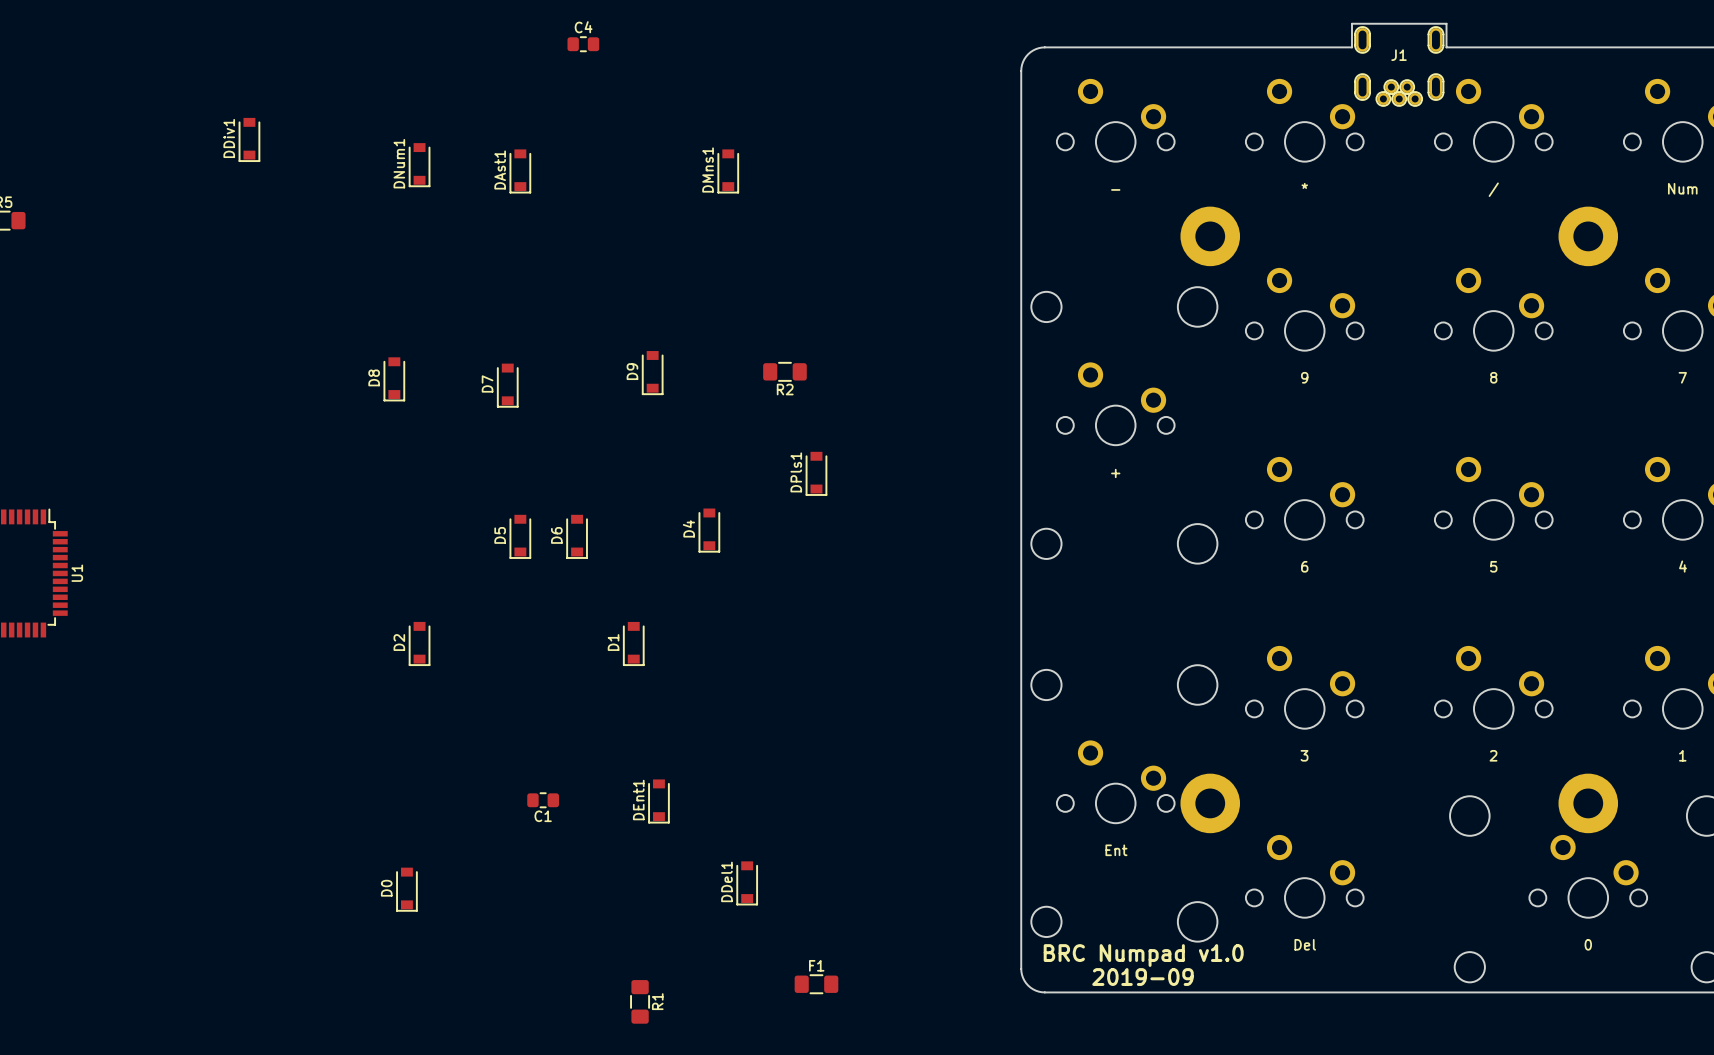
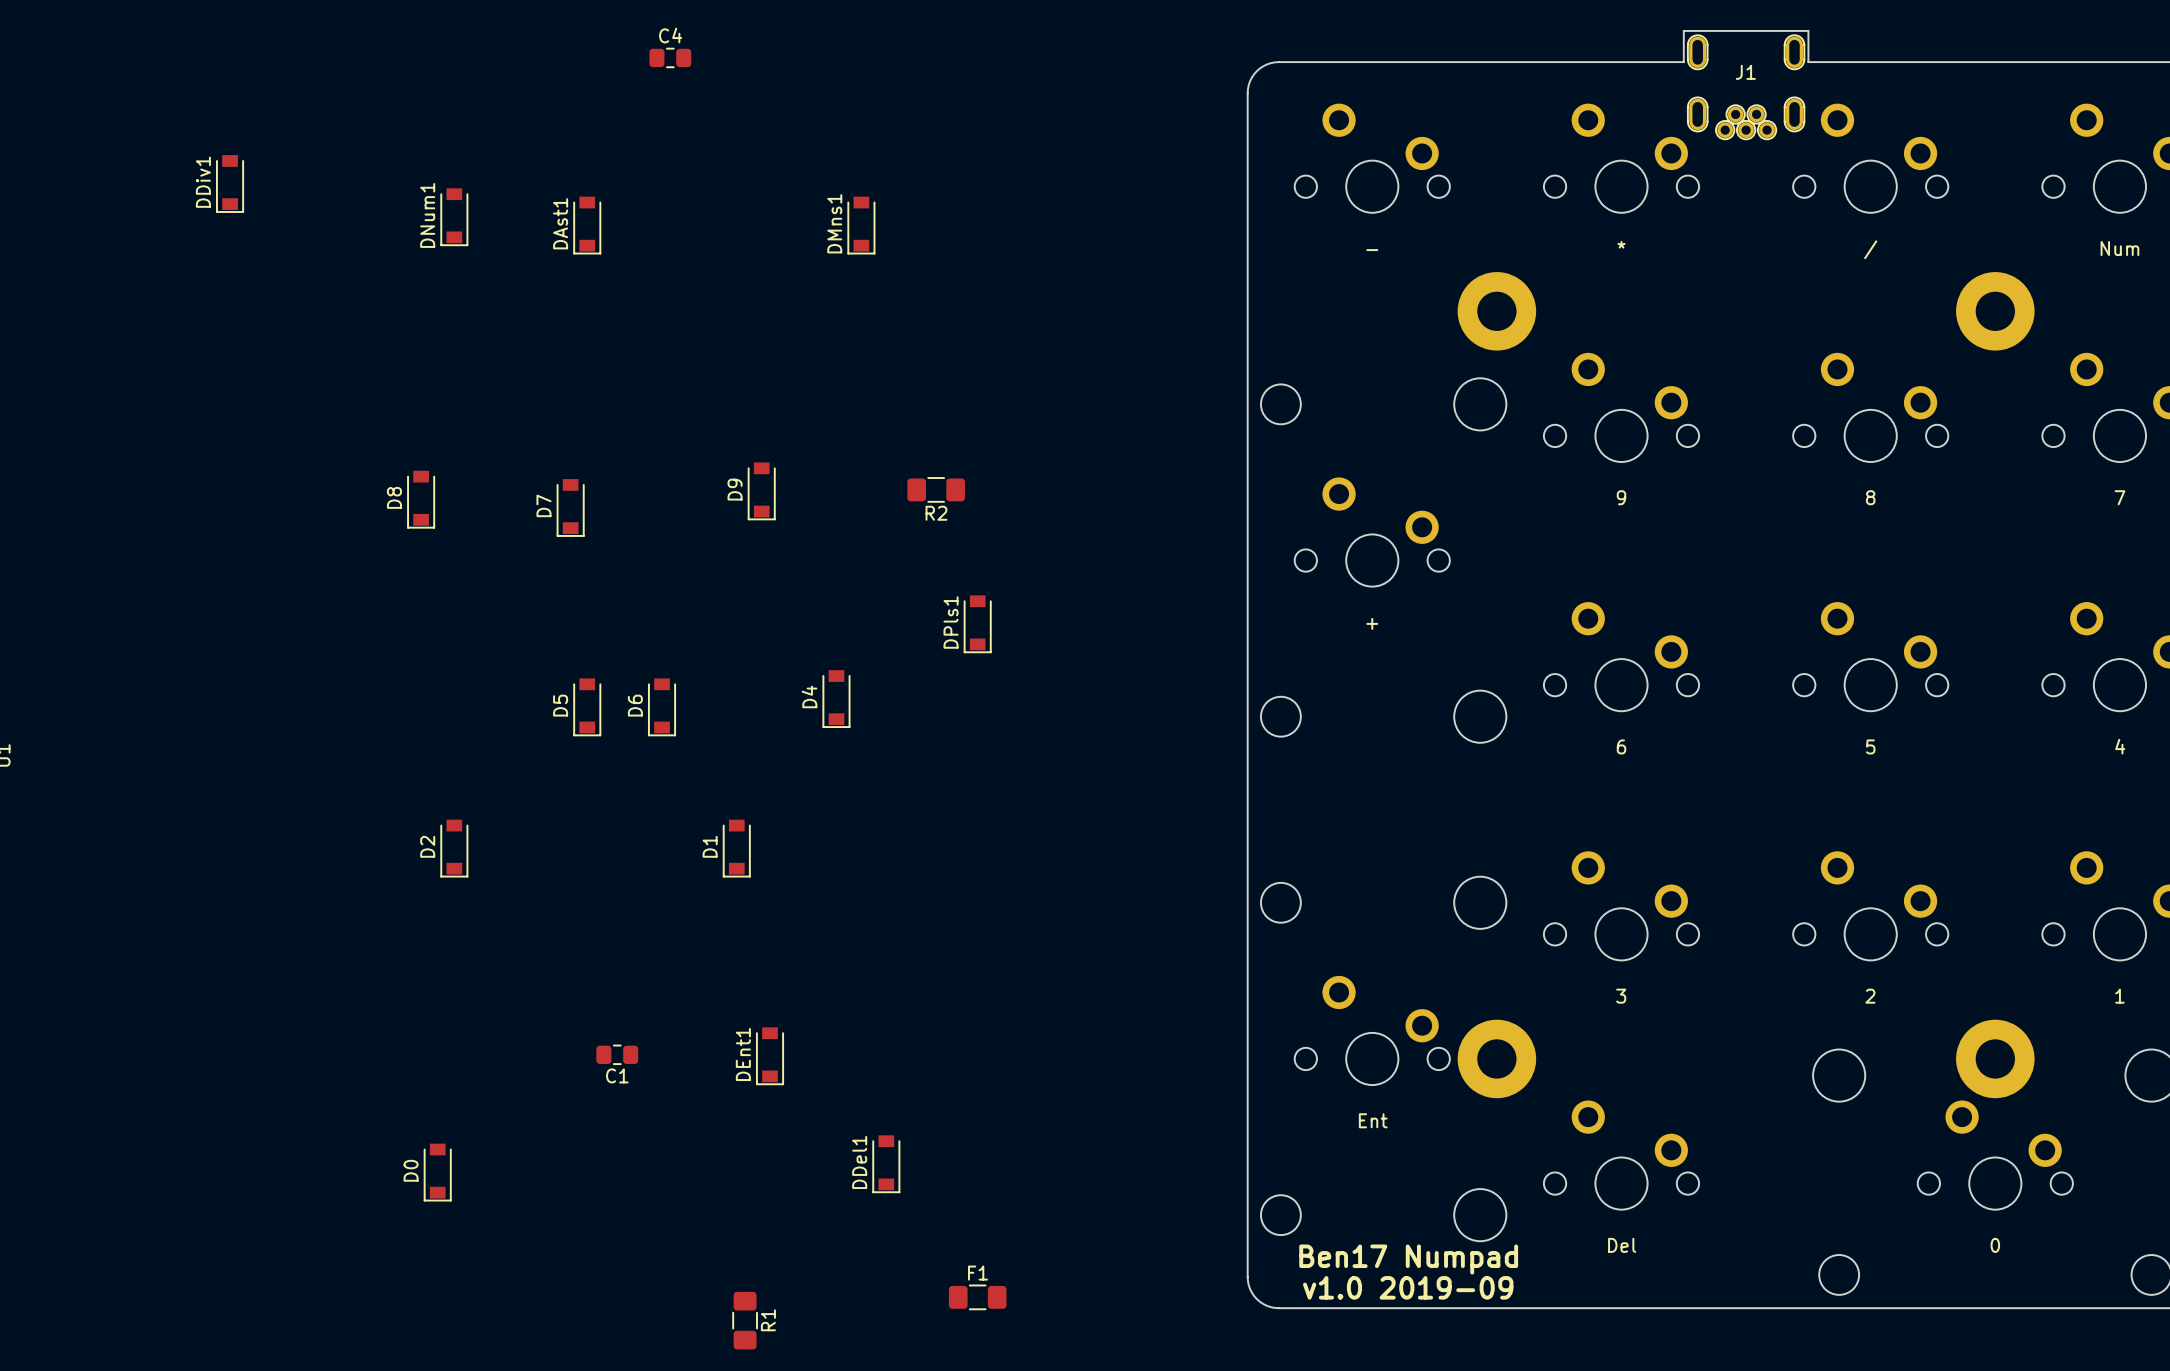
text: BRC Numpad v1.0 (1143, 955) -> Ben17 Numpad (1408, 1259)
text: 2019-09 (1142, 977) -> v1.0 2019-09 (1408, 1287)

